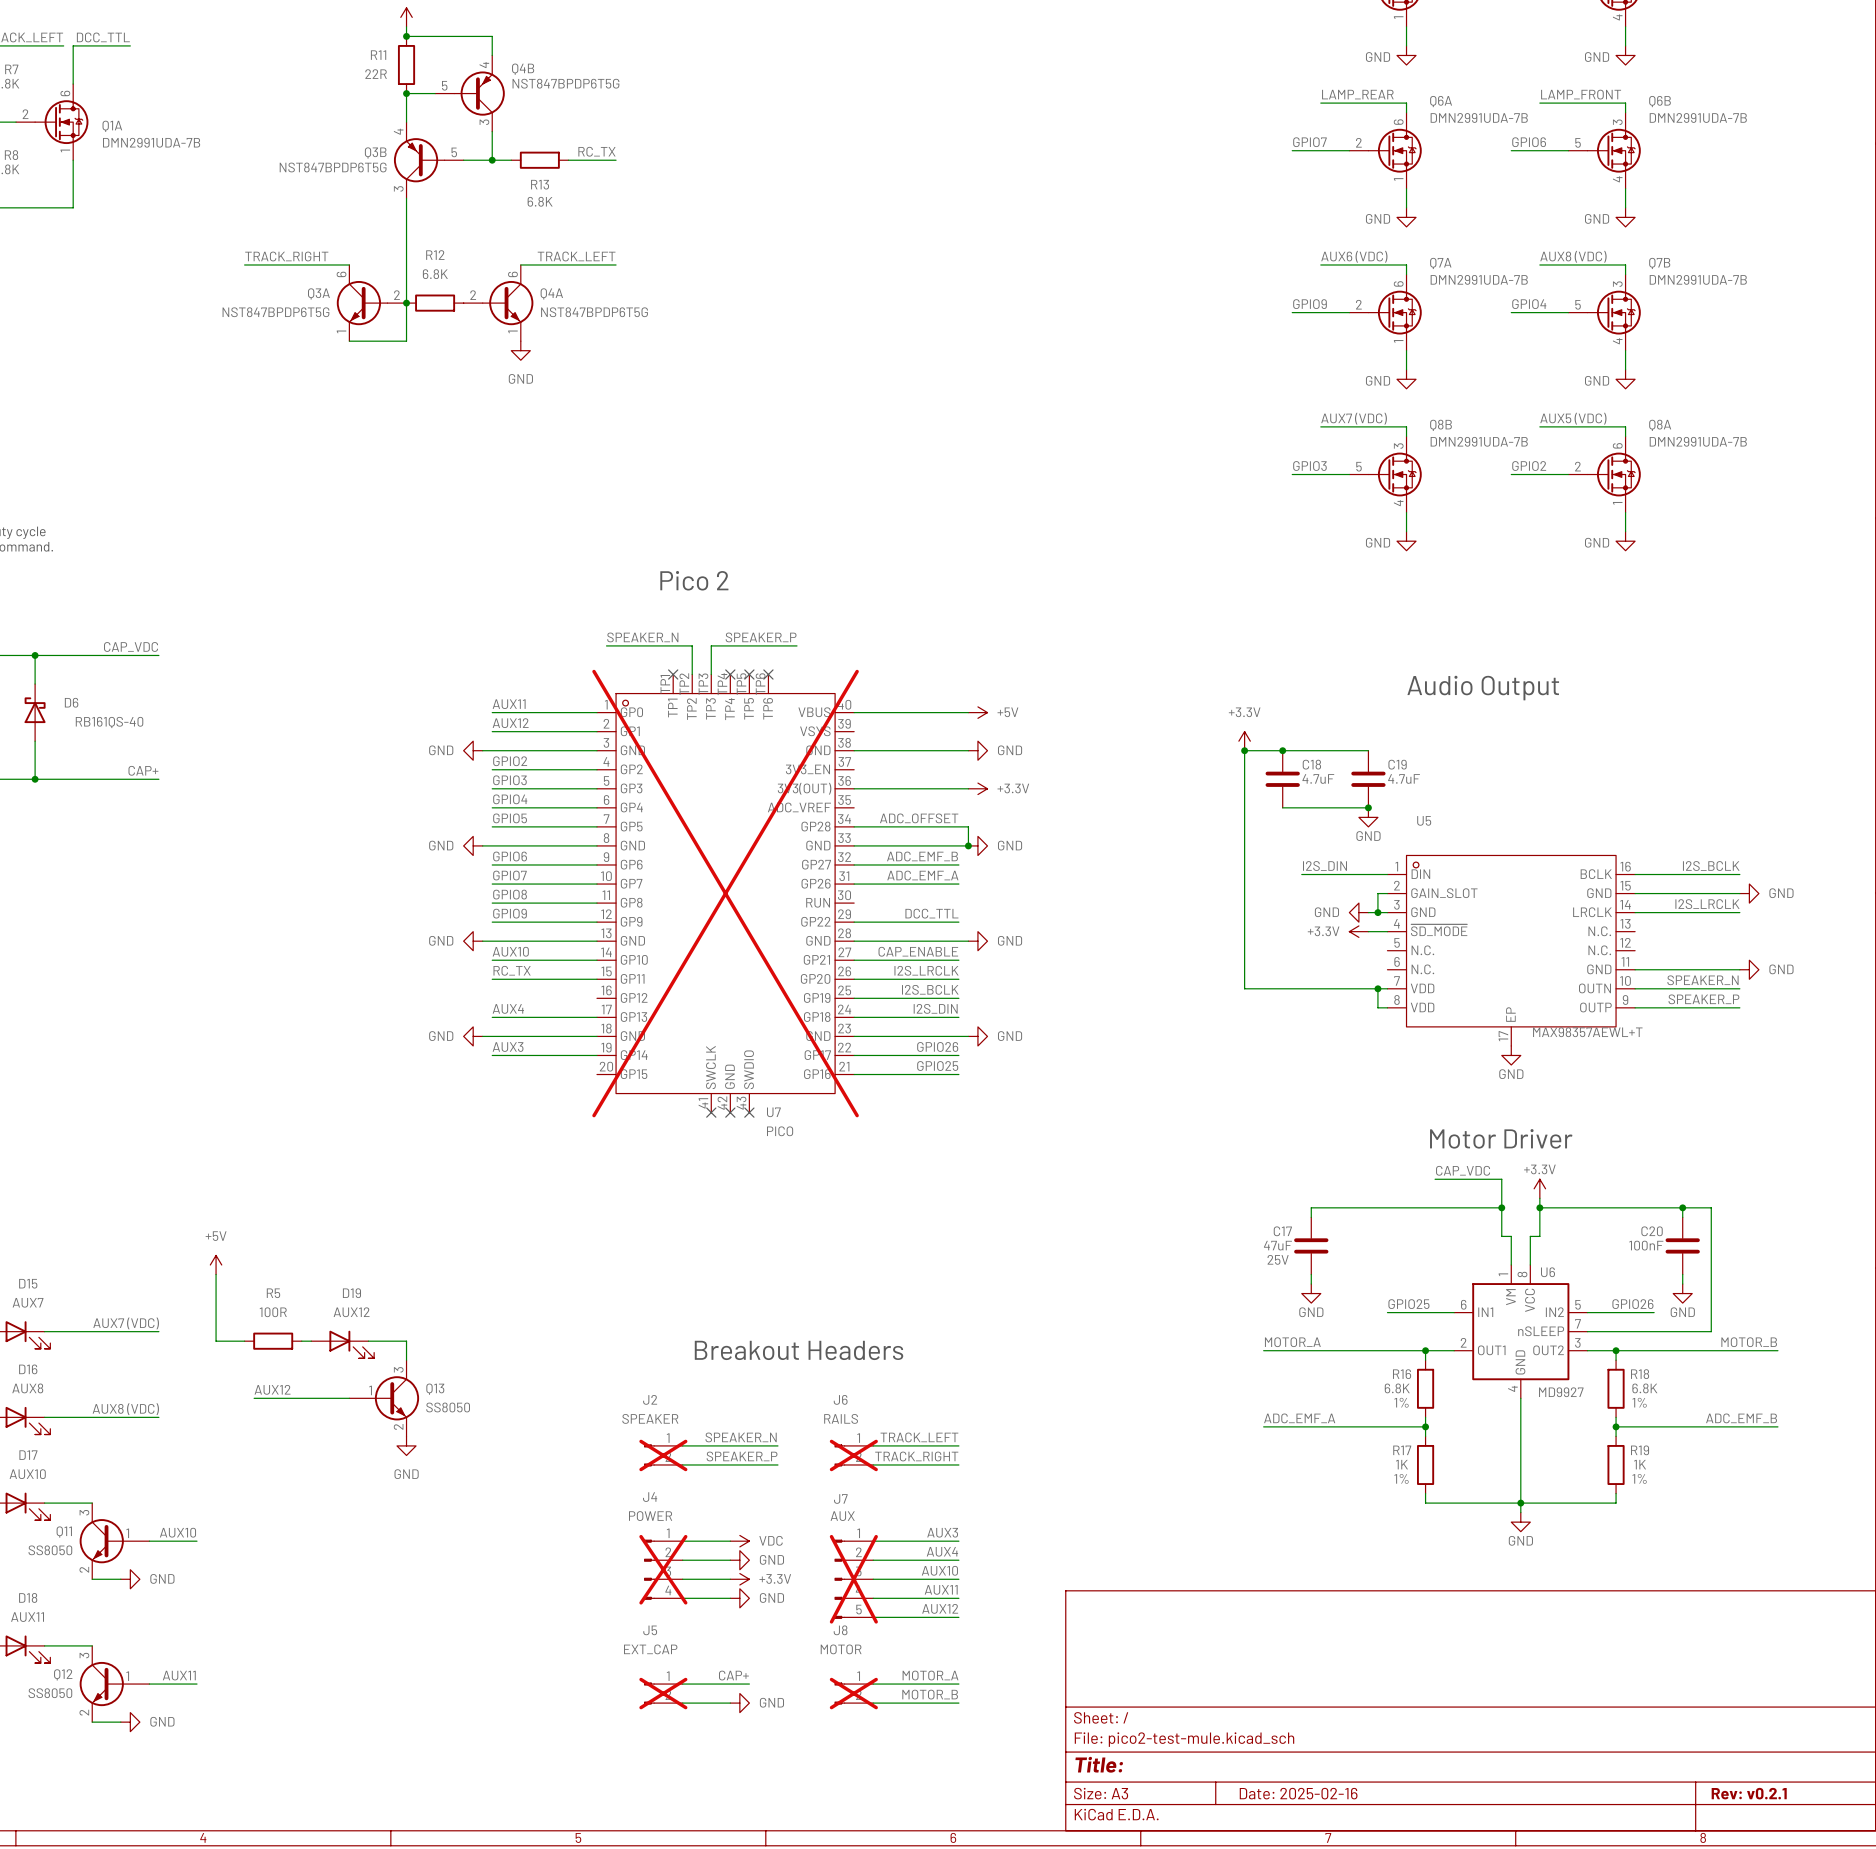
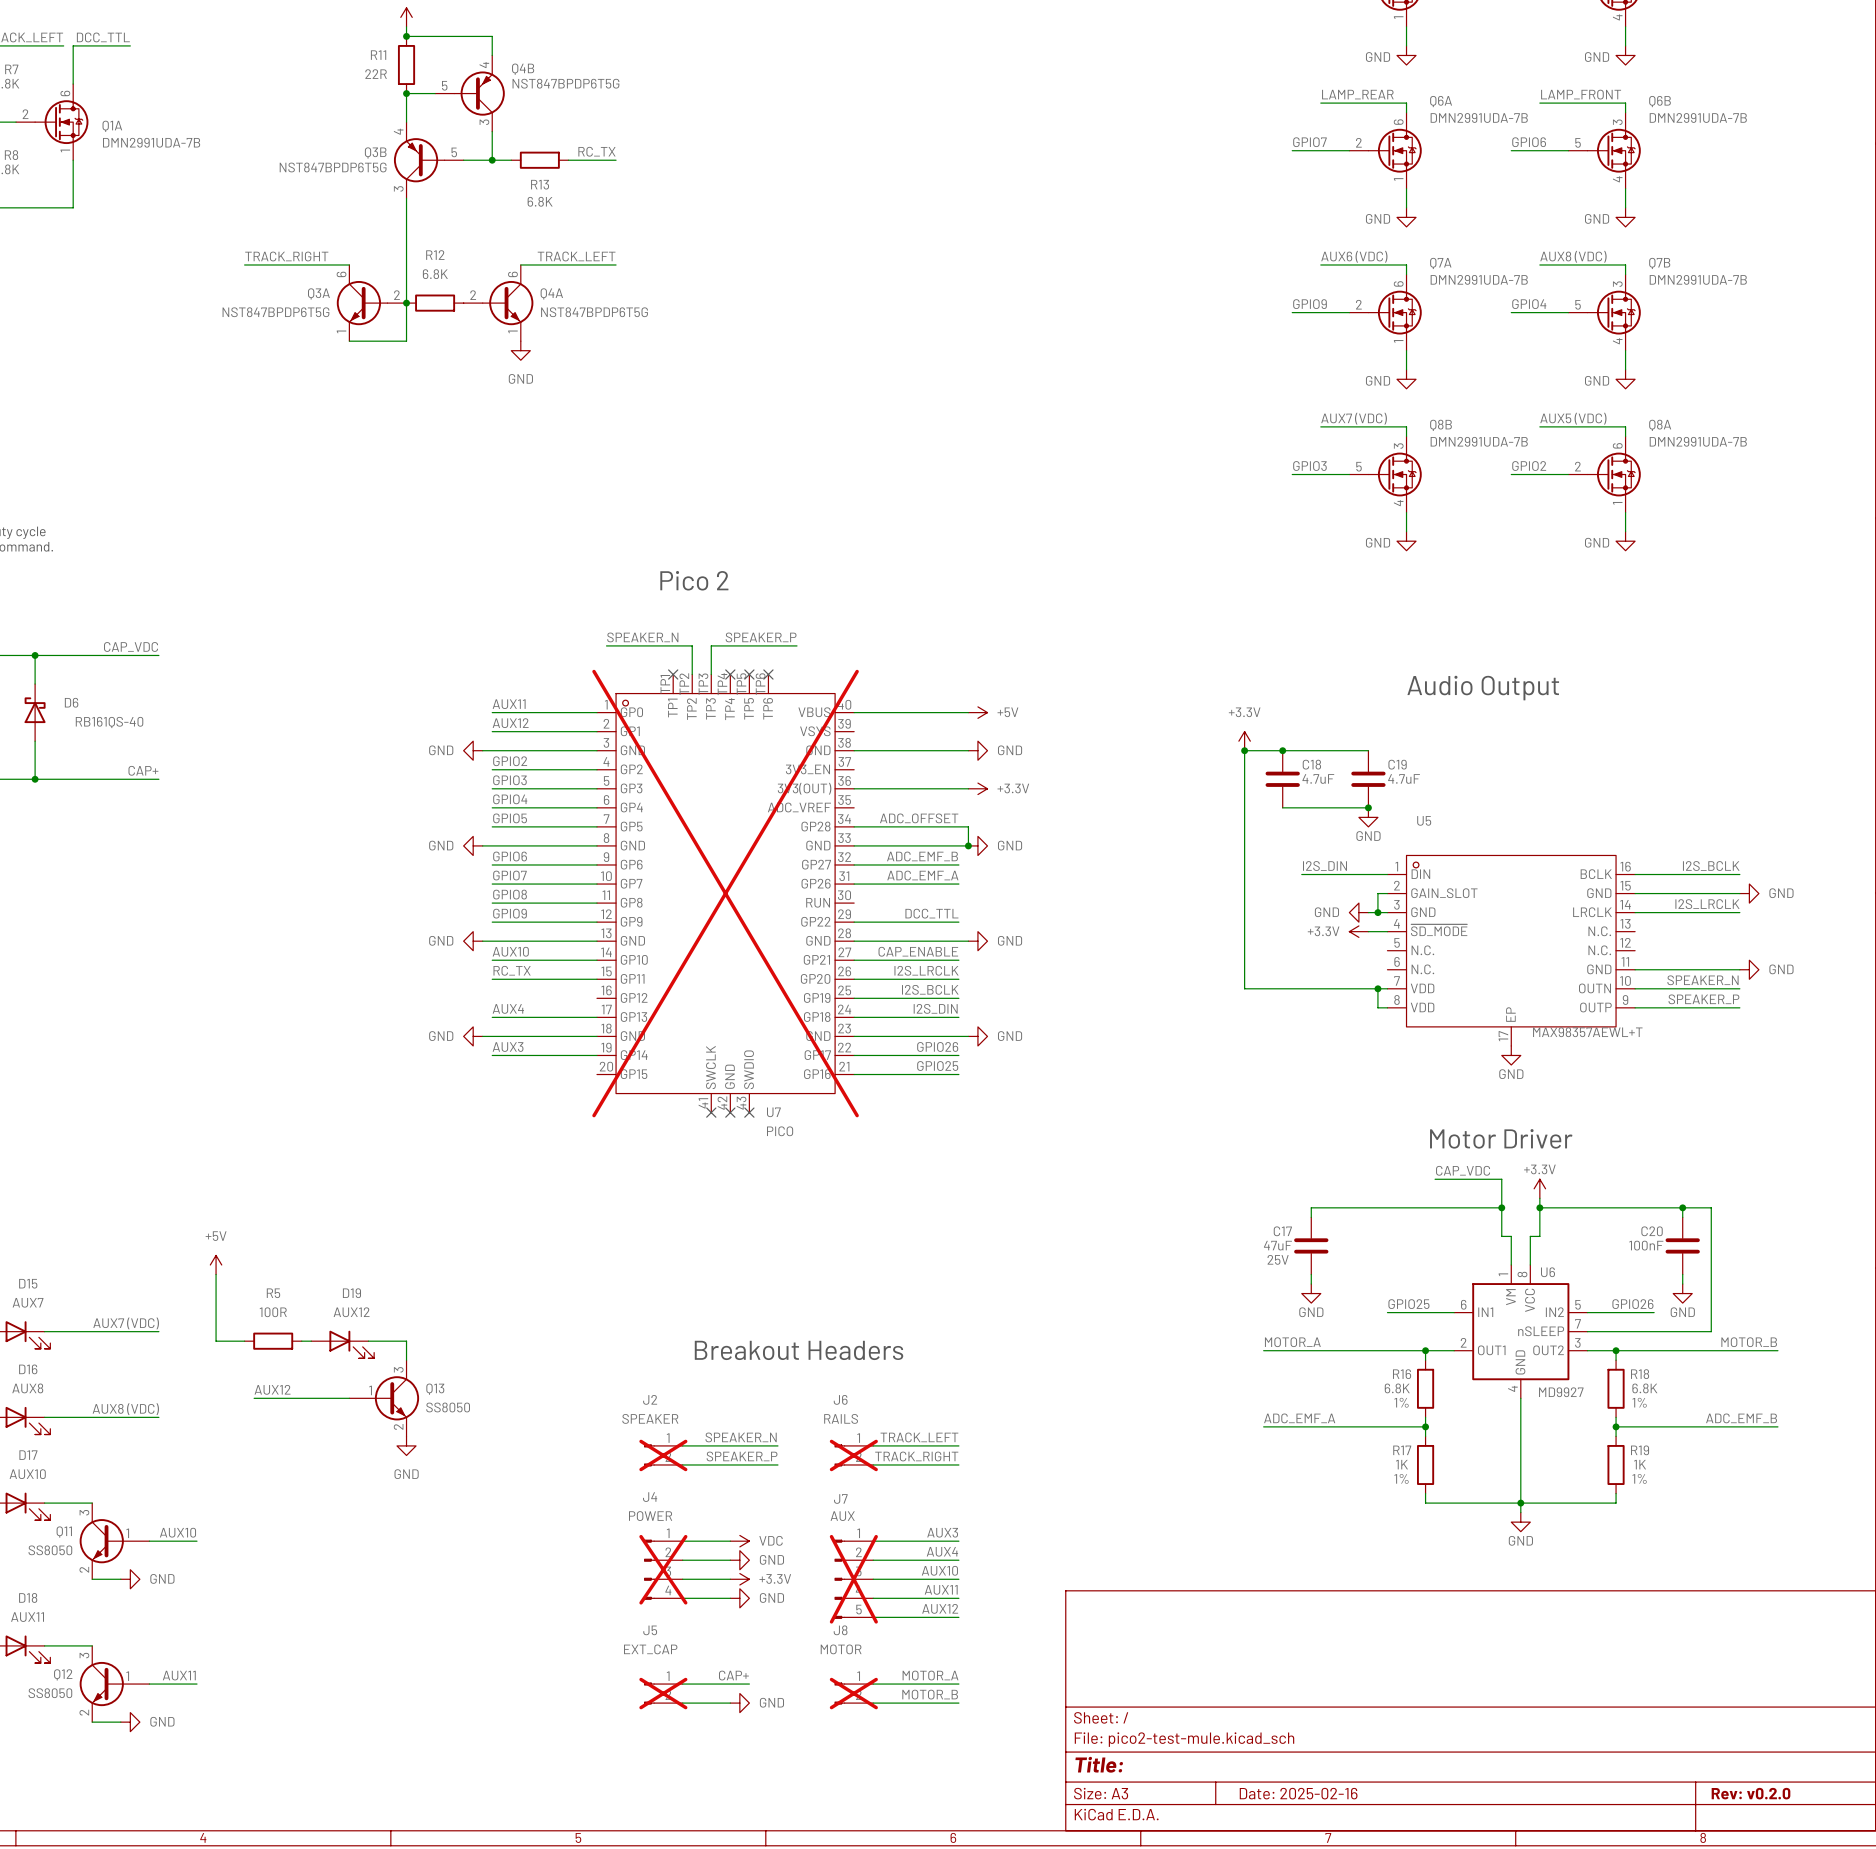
title block: Rev: v0.2.1 (1749, 1793) -> Rev: v0.2.0 (1751, 1793)

